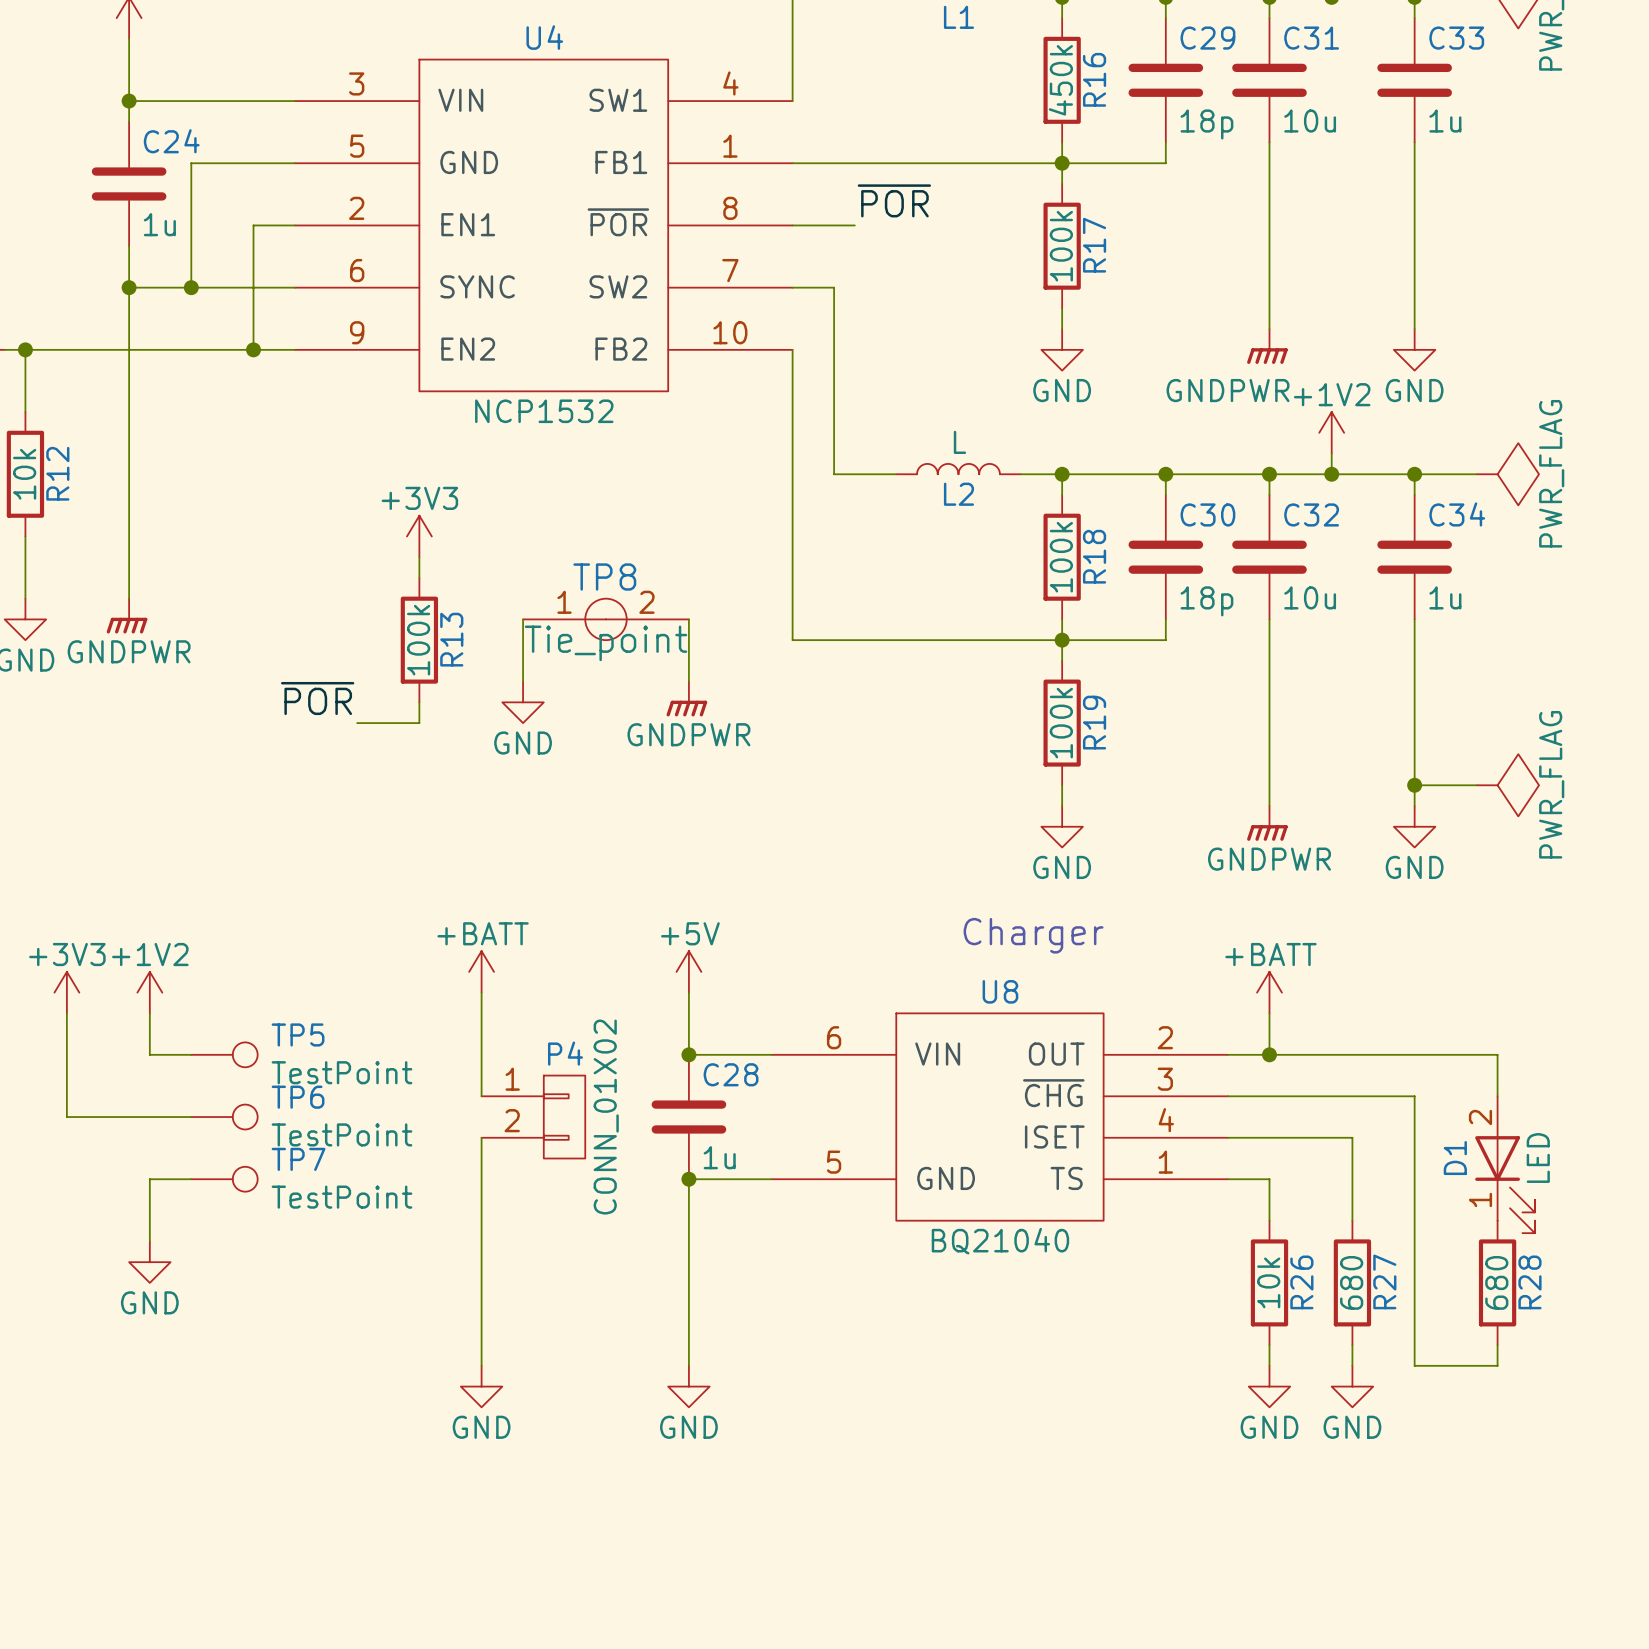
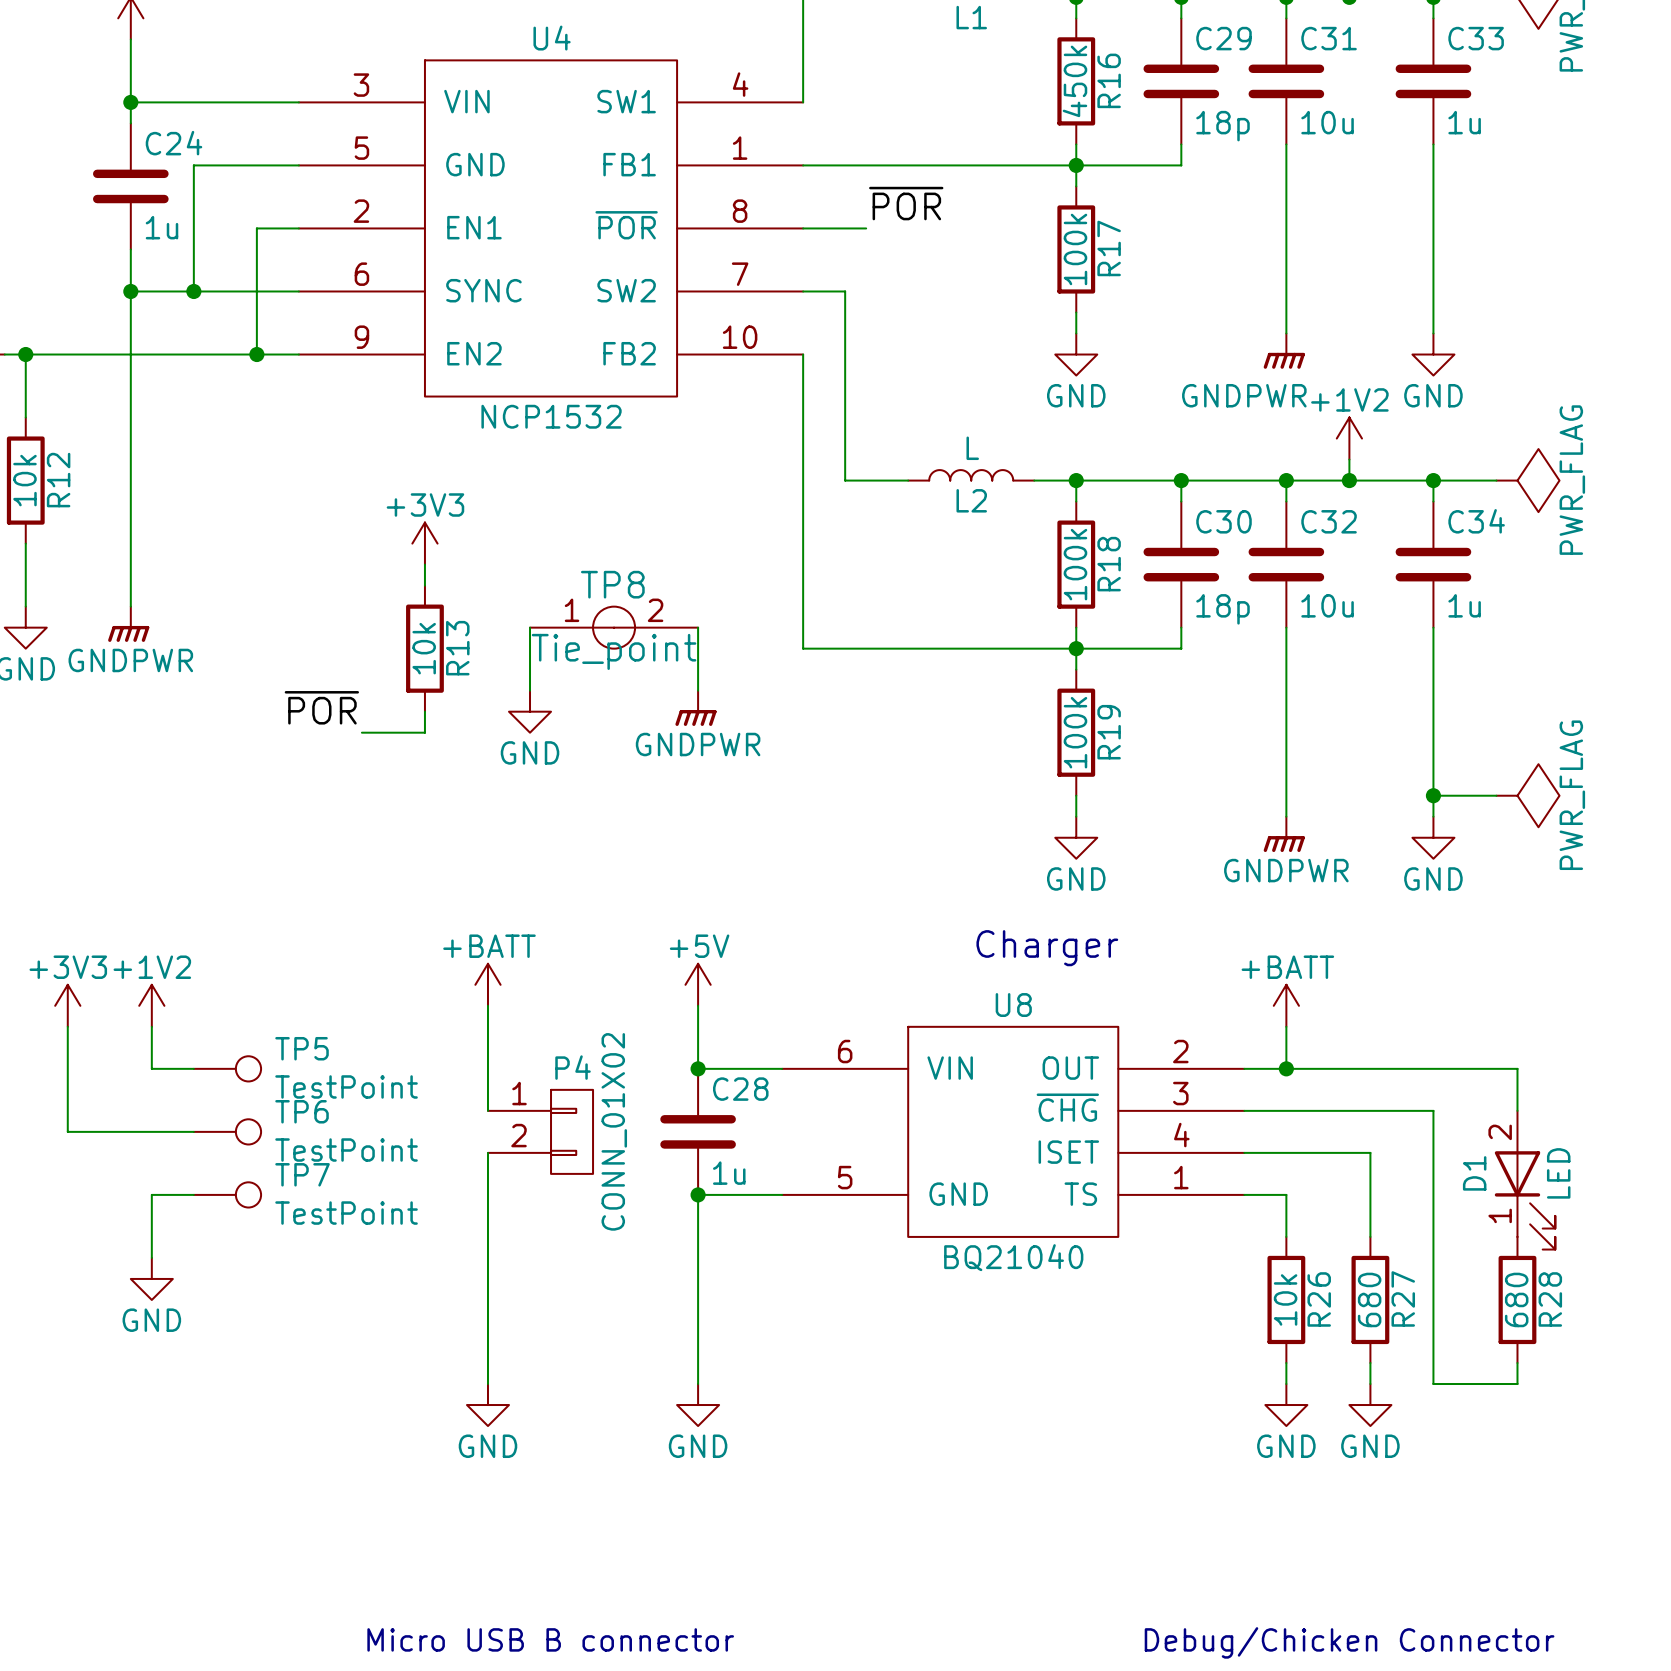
R13 value: 100k (418, 640) -> 10k (424, 648)
text: none -> Micro USB B connector (550, 1639)
text: none -> Debug/Chicken Connector (1349, 1642)

